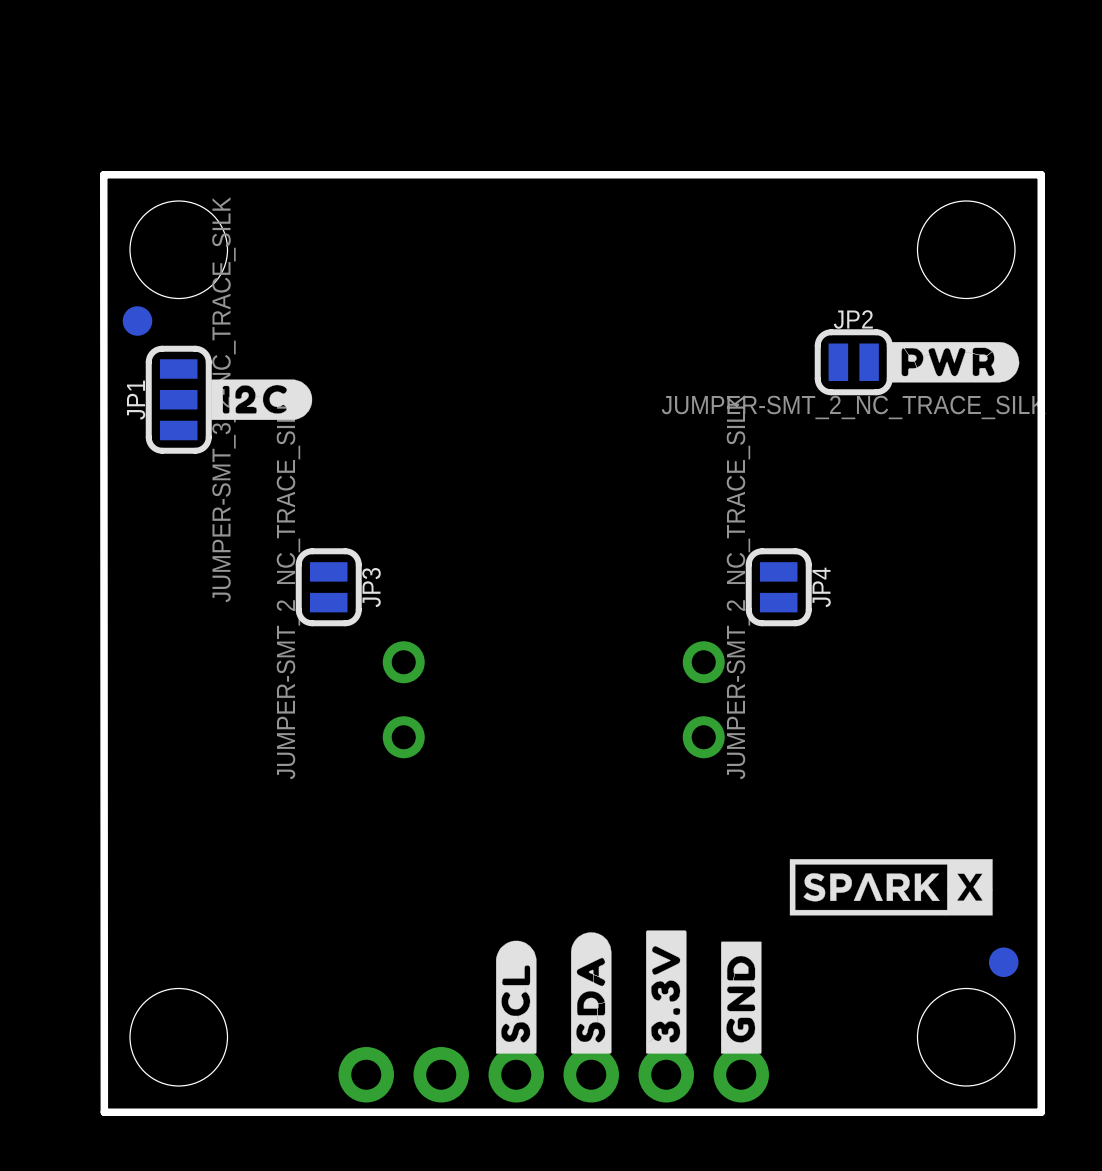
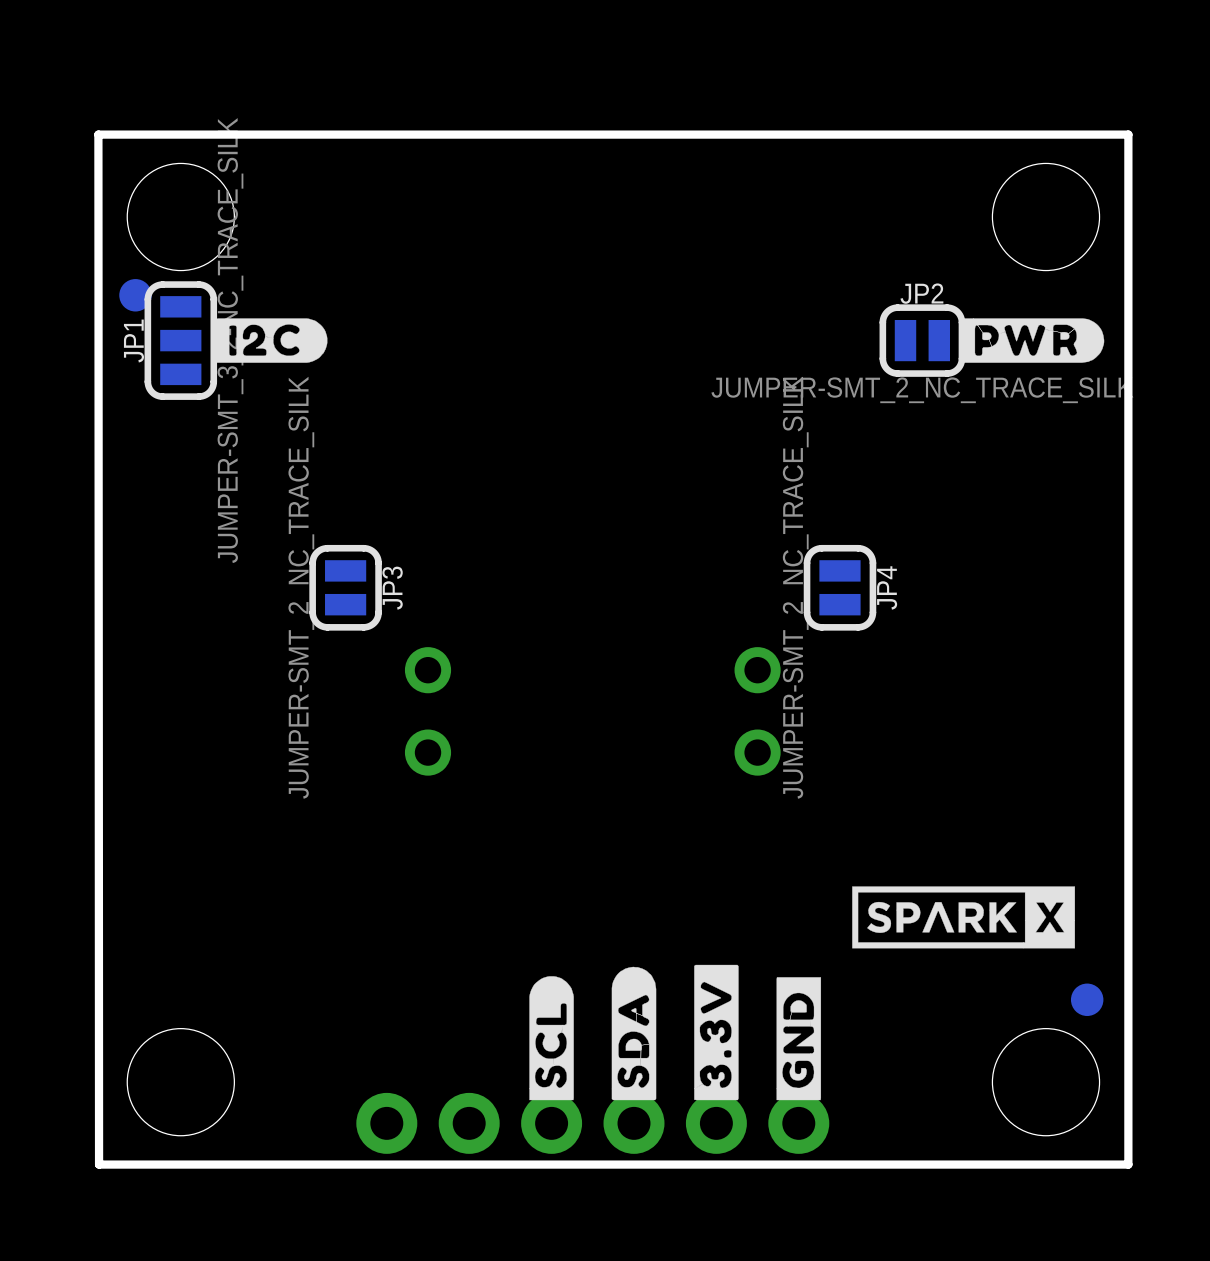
JP1 position: (178, 399) -> (180, 340)
drawing position: (261, 399) -> (271, 340)

